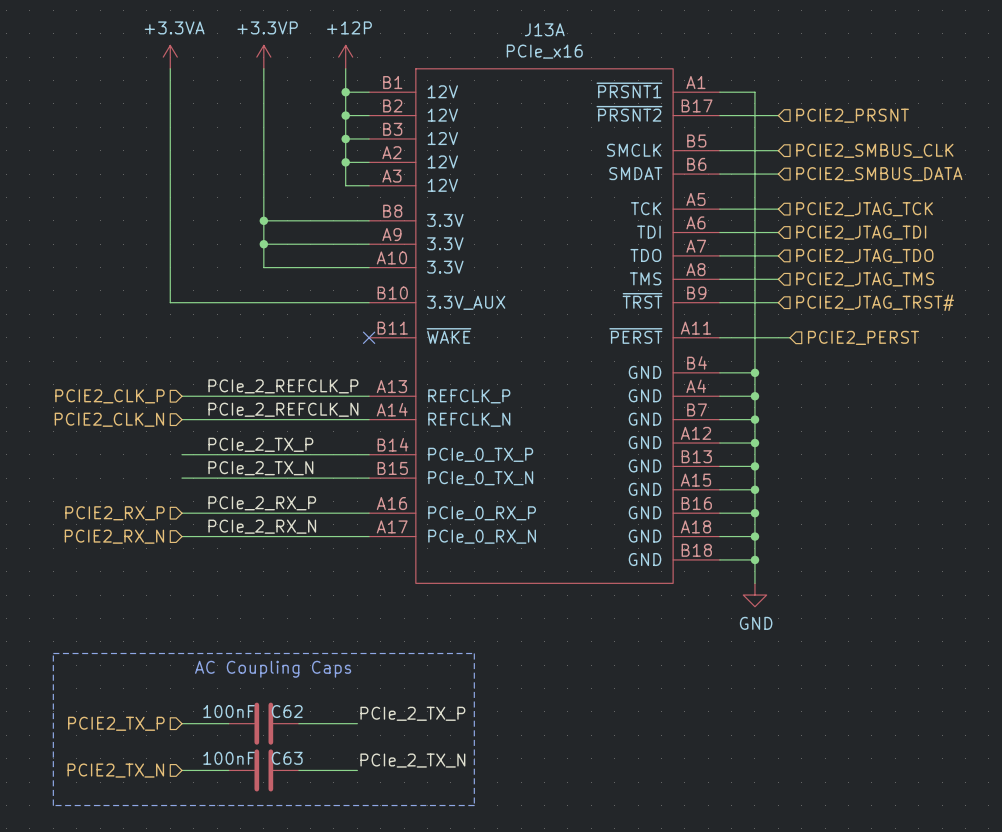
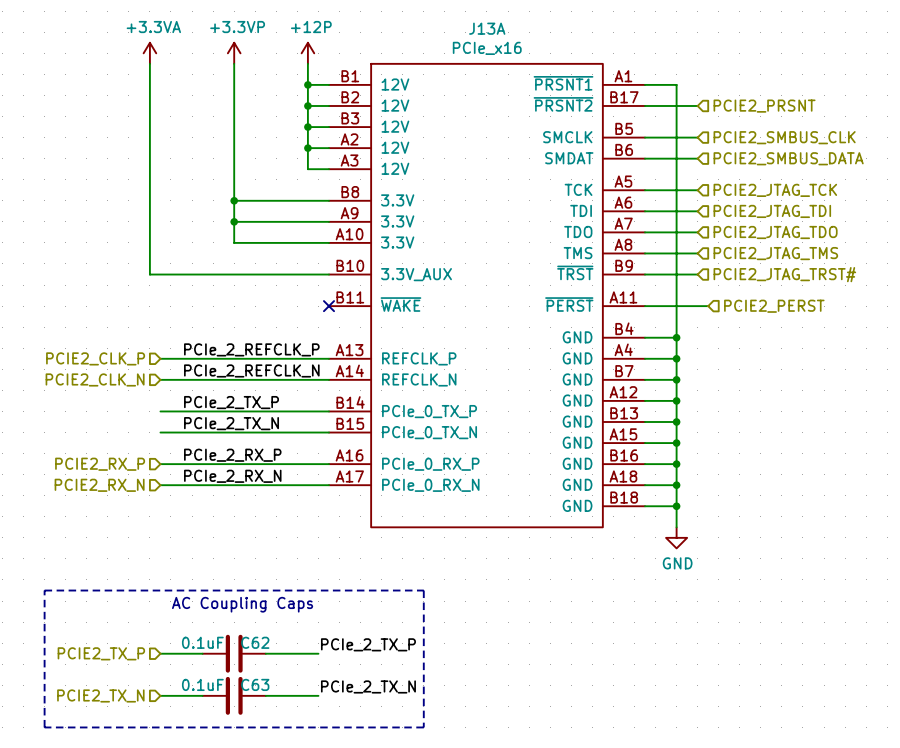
C62 value: 100nF (229, 711) -> 0.1uF (202, 642)
C63 value: 100nF (229, 758) -> 0.1uF (202, 684)

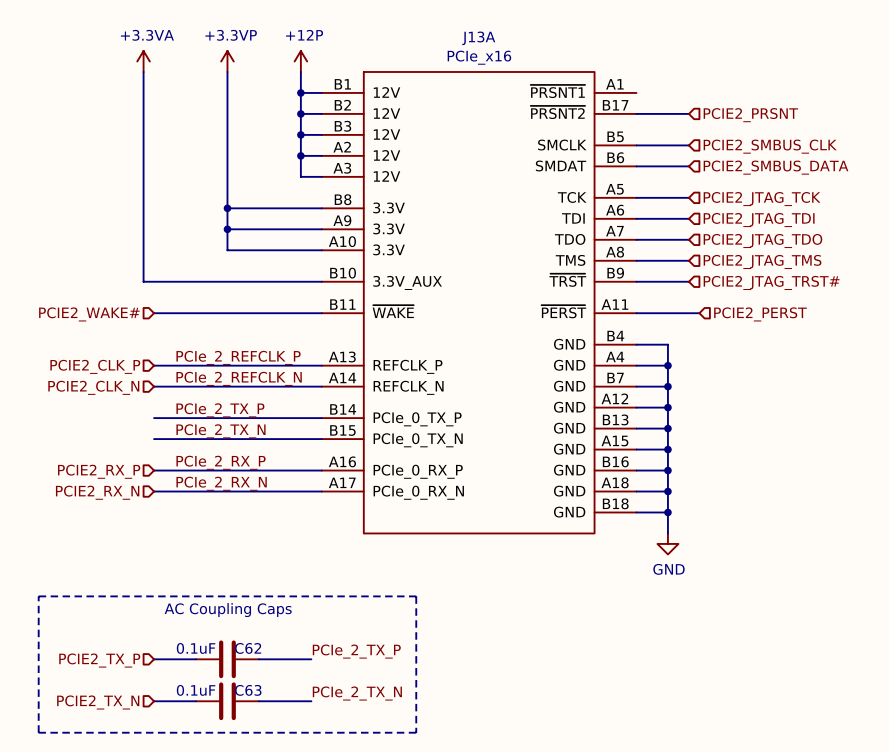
wire: (644, 84) (676, 84) (676, 337) -> none
hierarchical label: none -> PCIE2_WAKE# (89, 314)
wire: none -> (154, 313) (321, 313)
no-connect mark: (328, 306) -> none
junction: (676, 337) -> none

